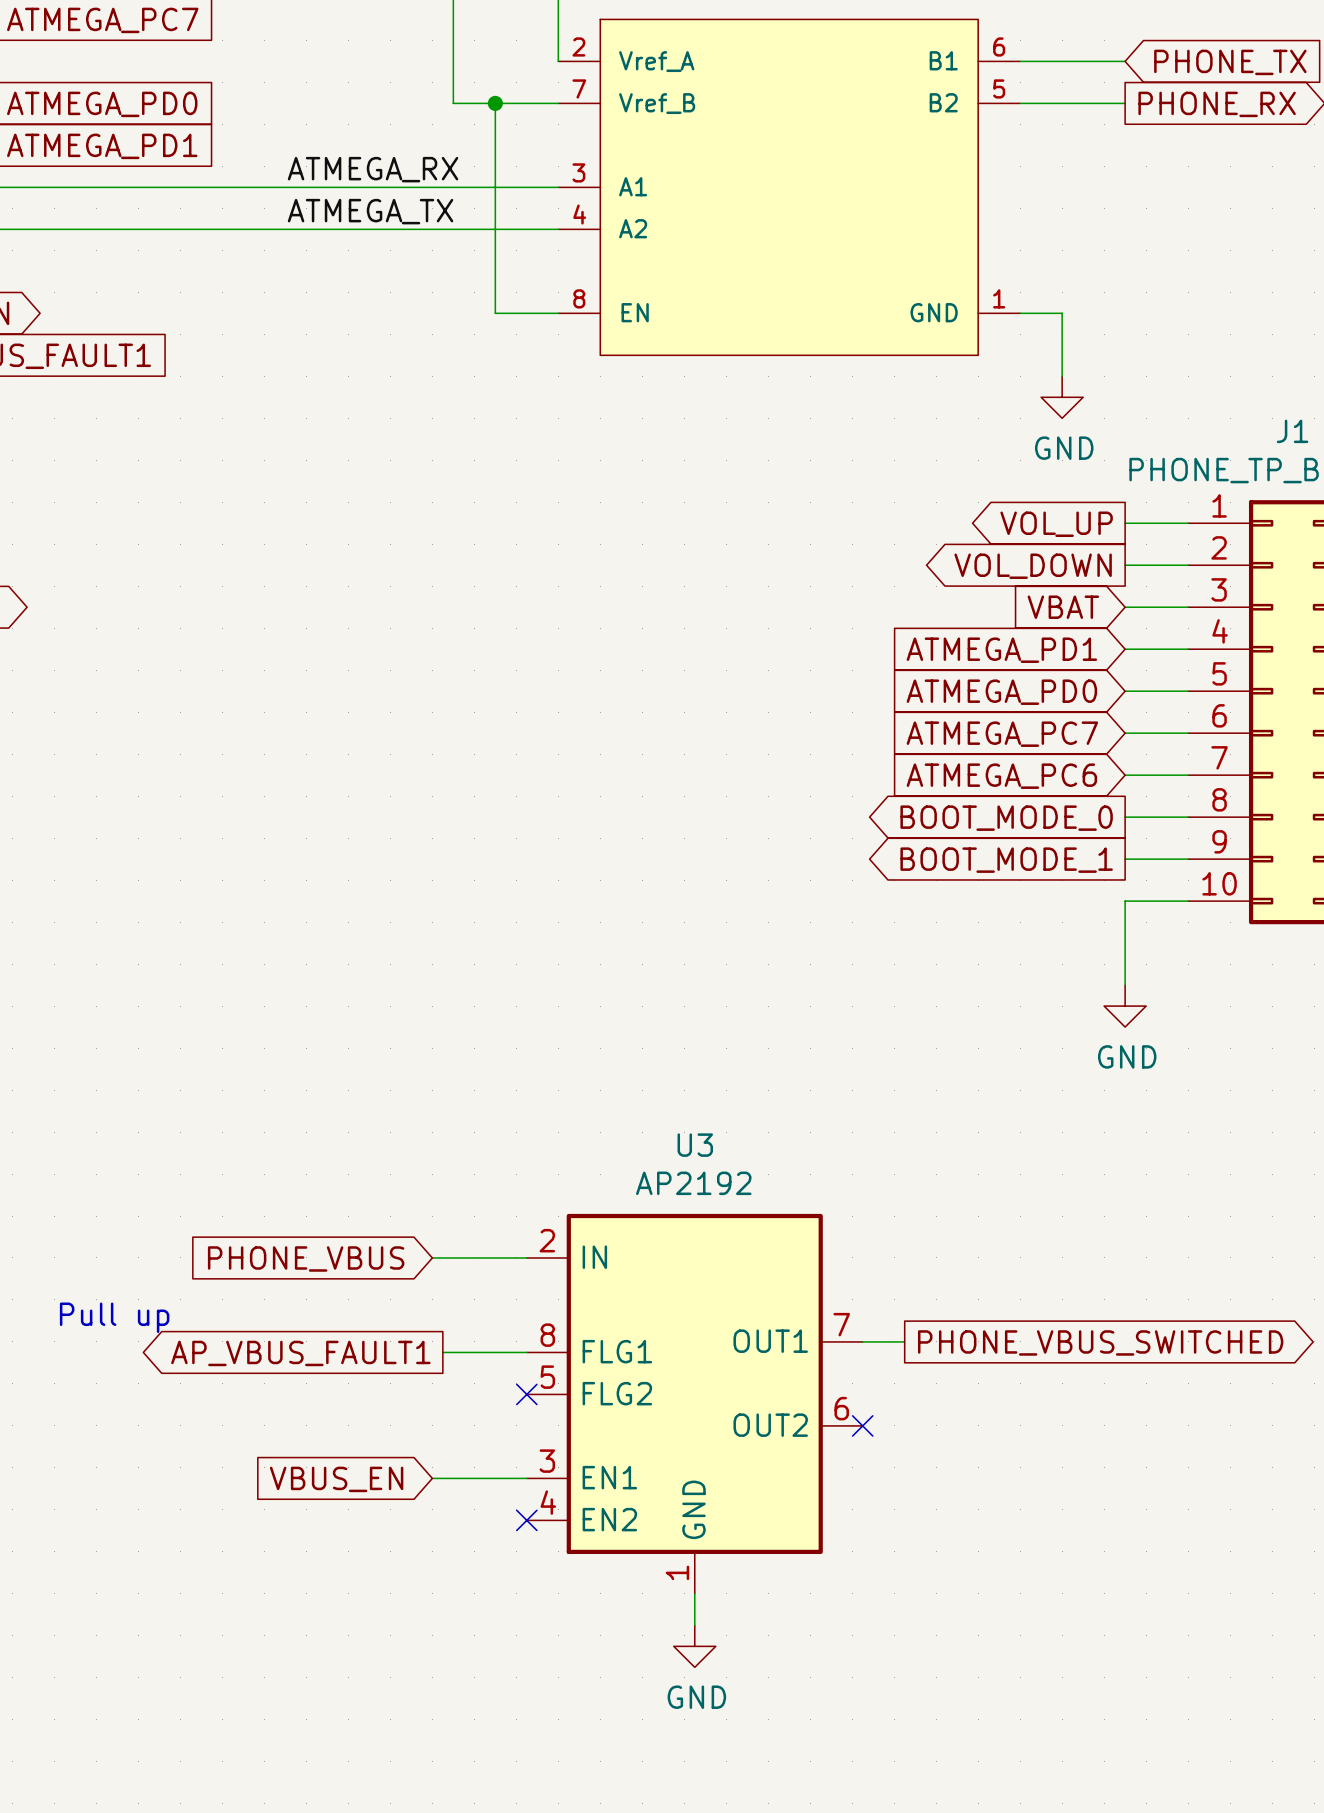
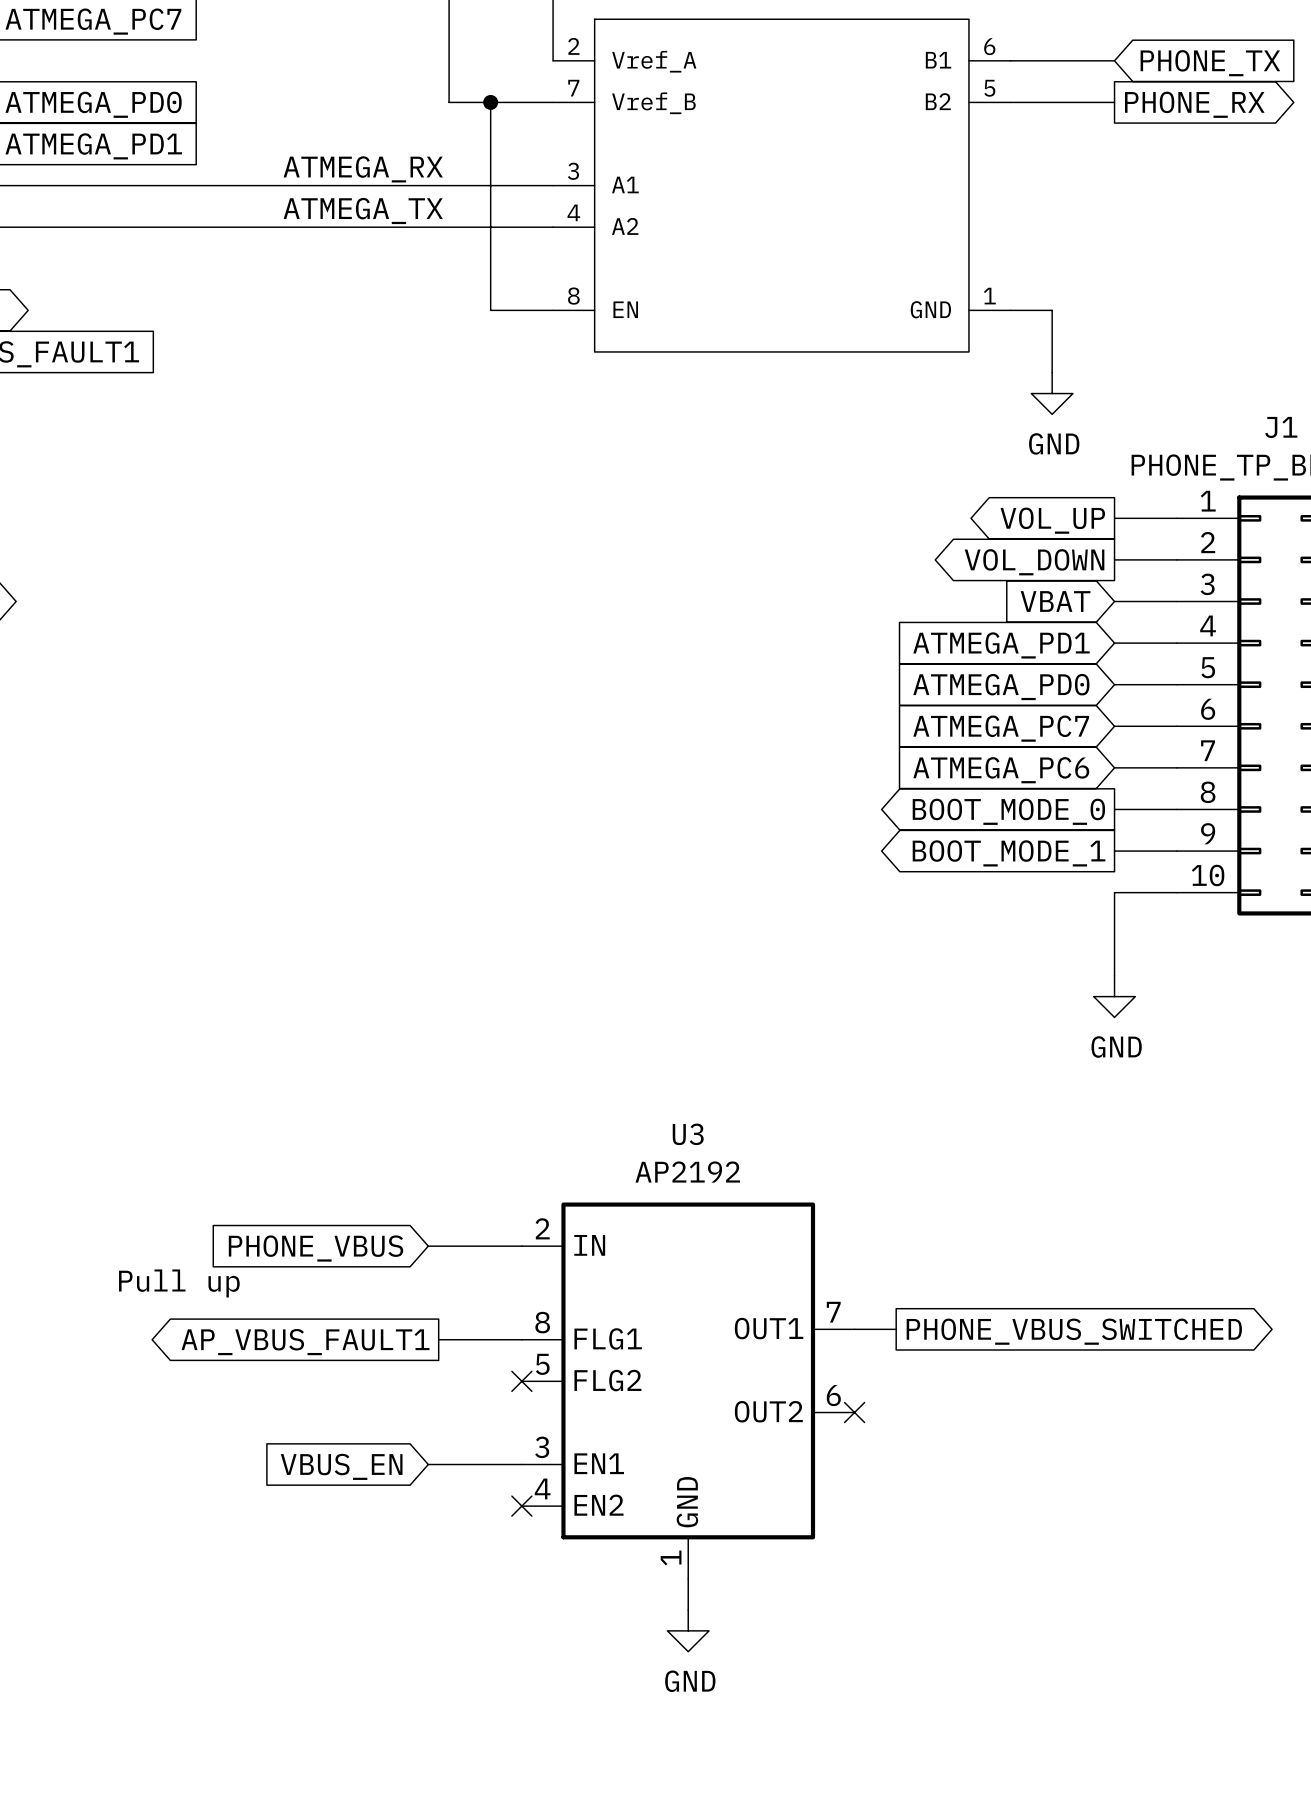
text position: Pull up (114, 1317) -> Pull up (179, 1283)

